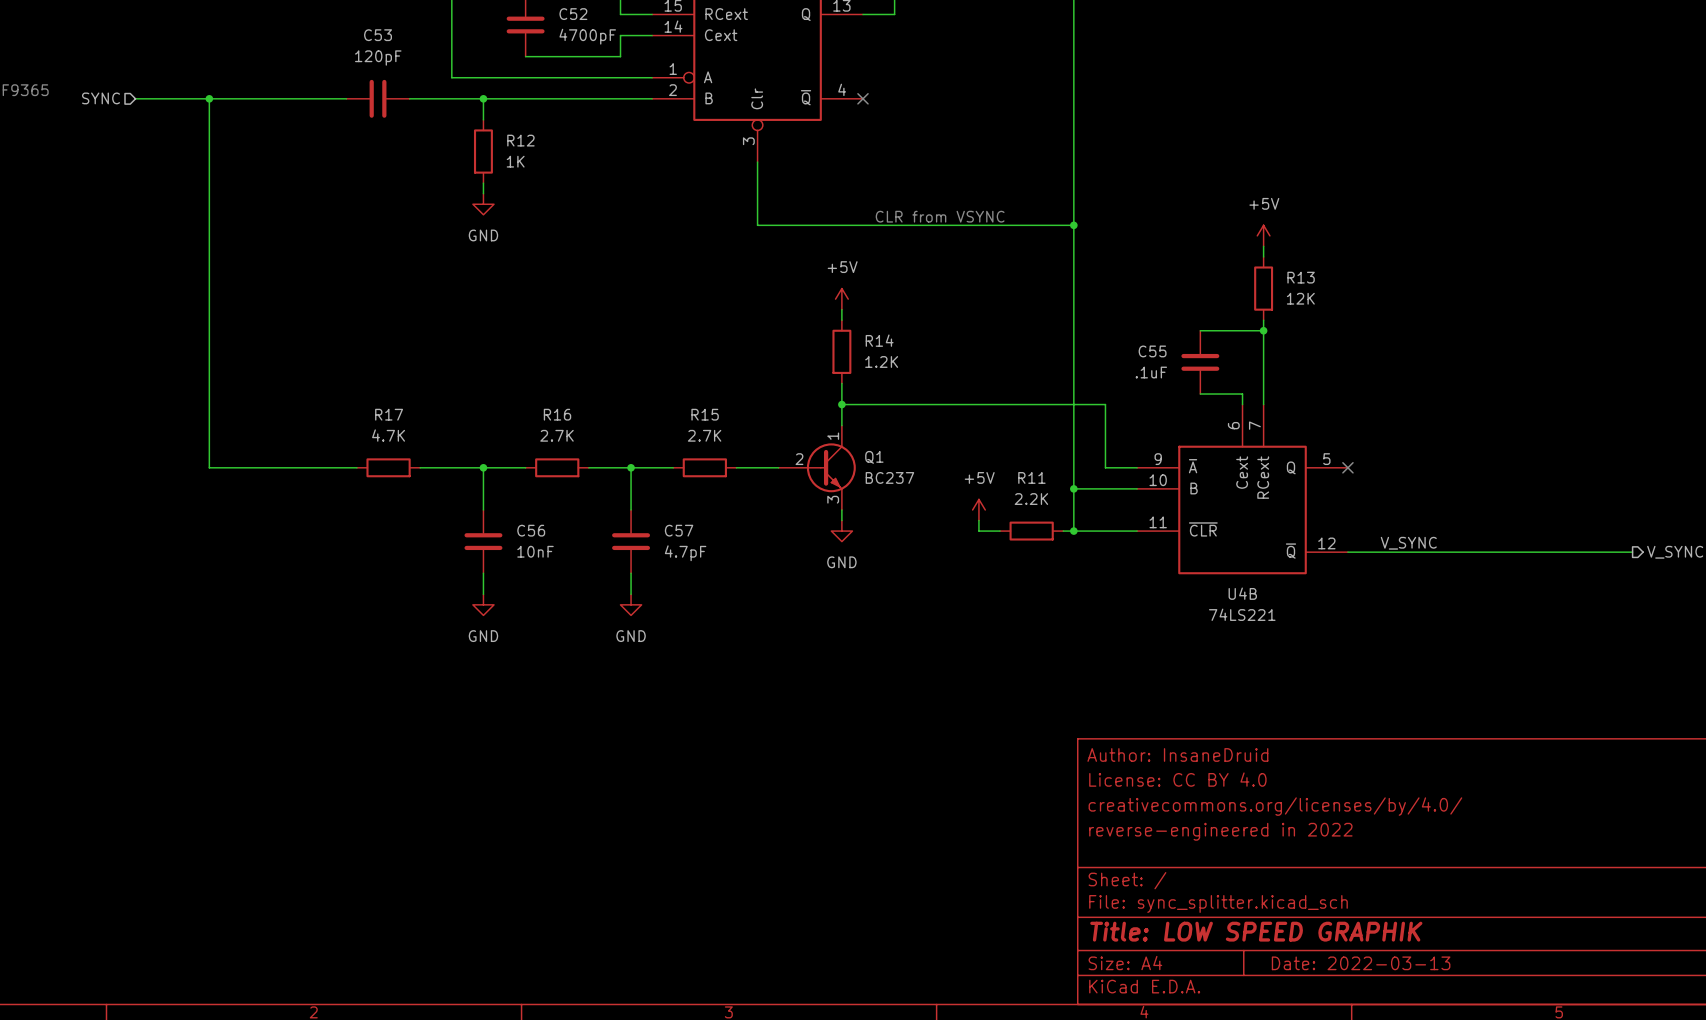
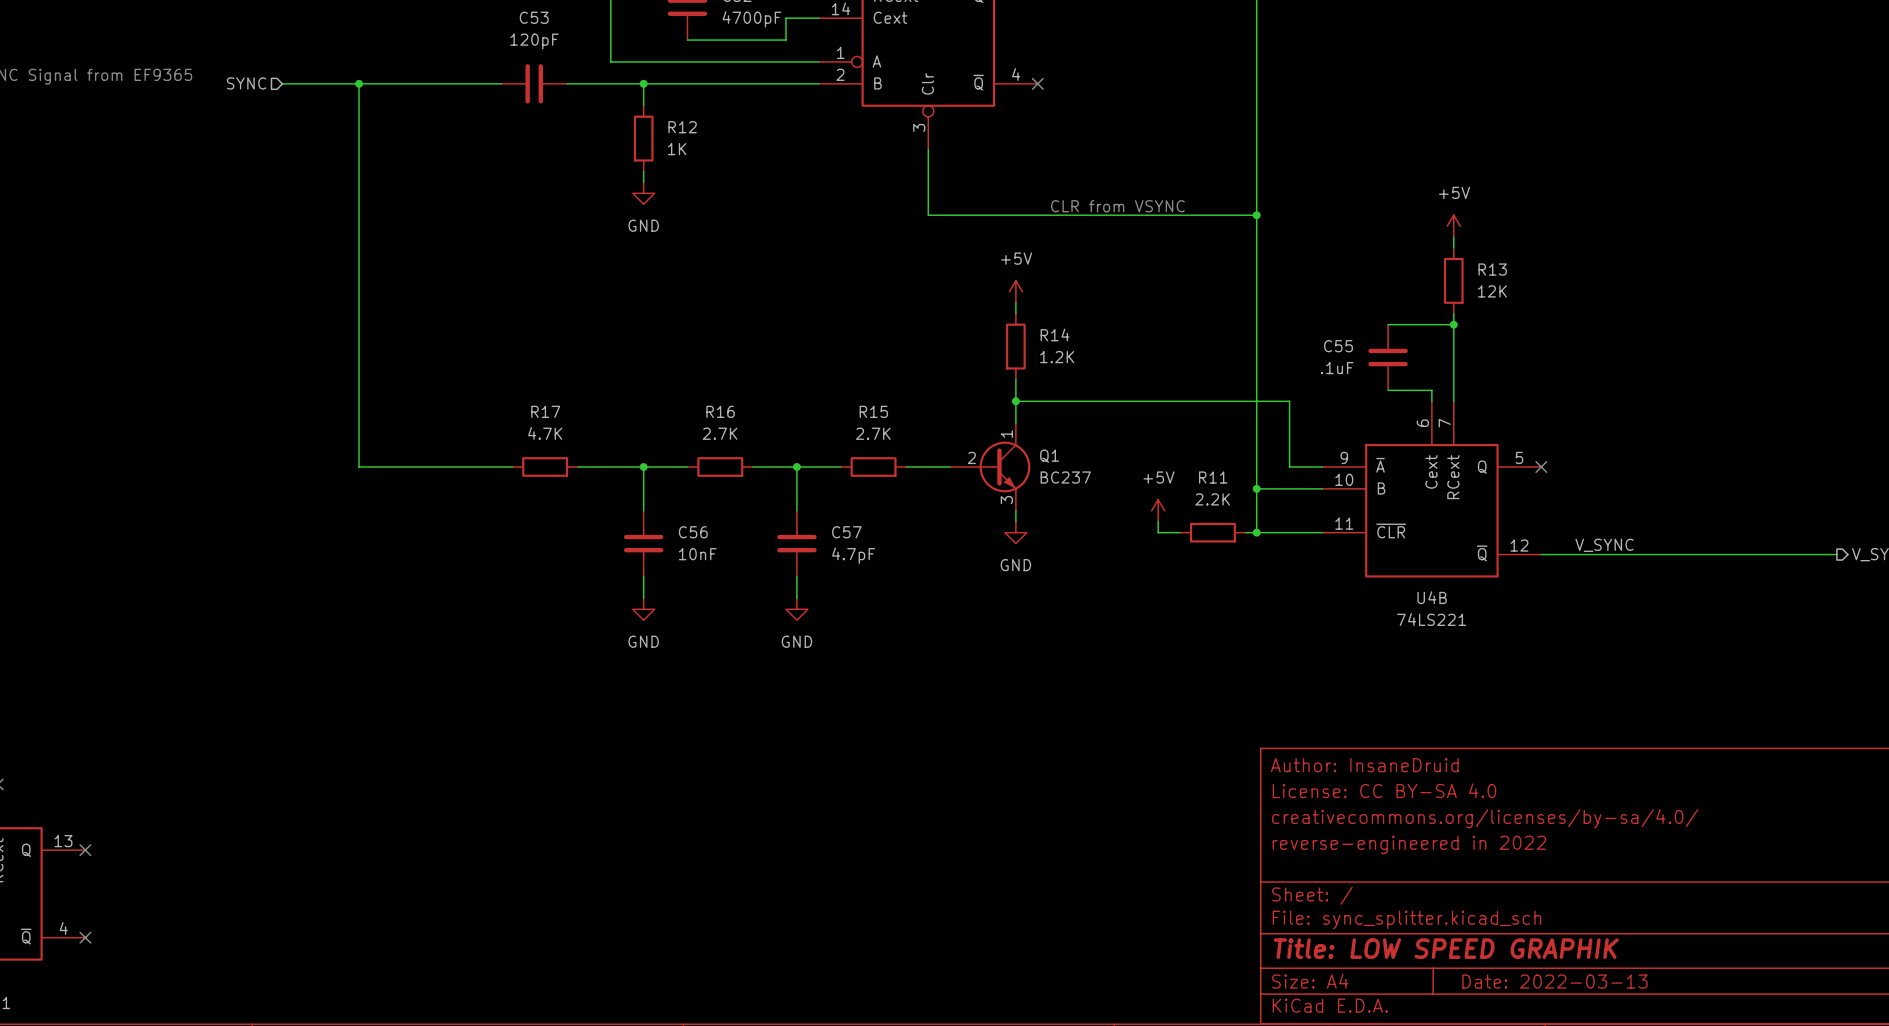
title block: License: CC BY 4.0 (1177, 779) -> License: CC BY-SA 4.0 (1384, 790)
title block: creativecommons.org/licenses/by/4.0/ (1275, 806) -> creativecommons.org/licenses/by-sa/4.0/ (1485, 818)

